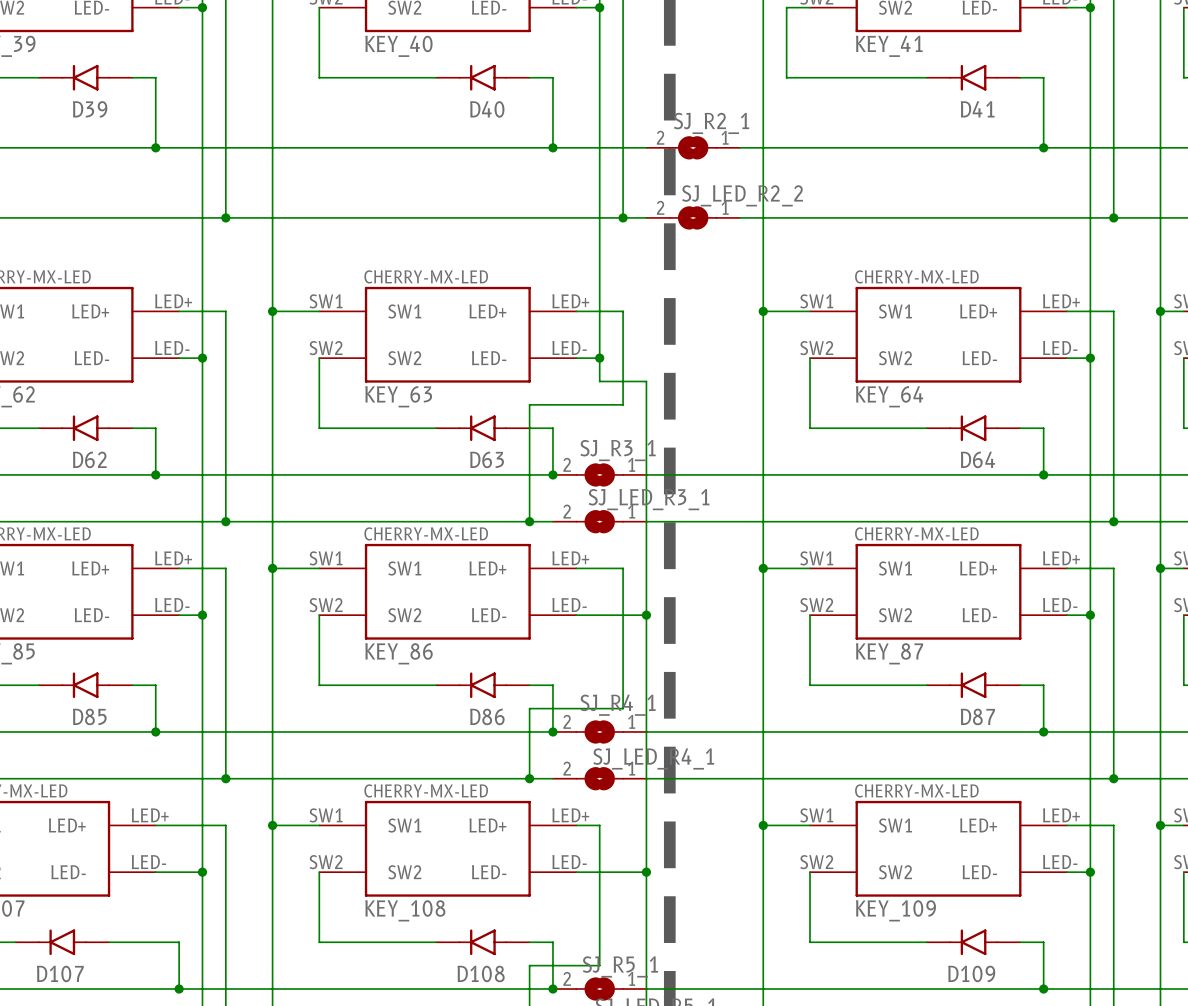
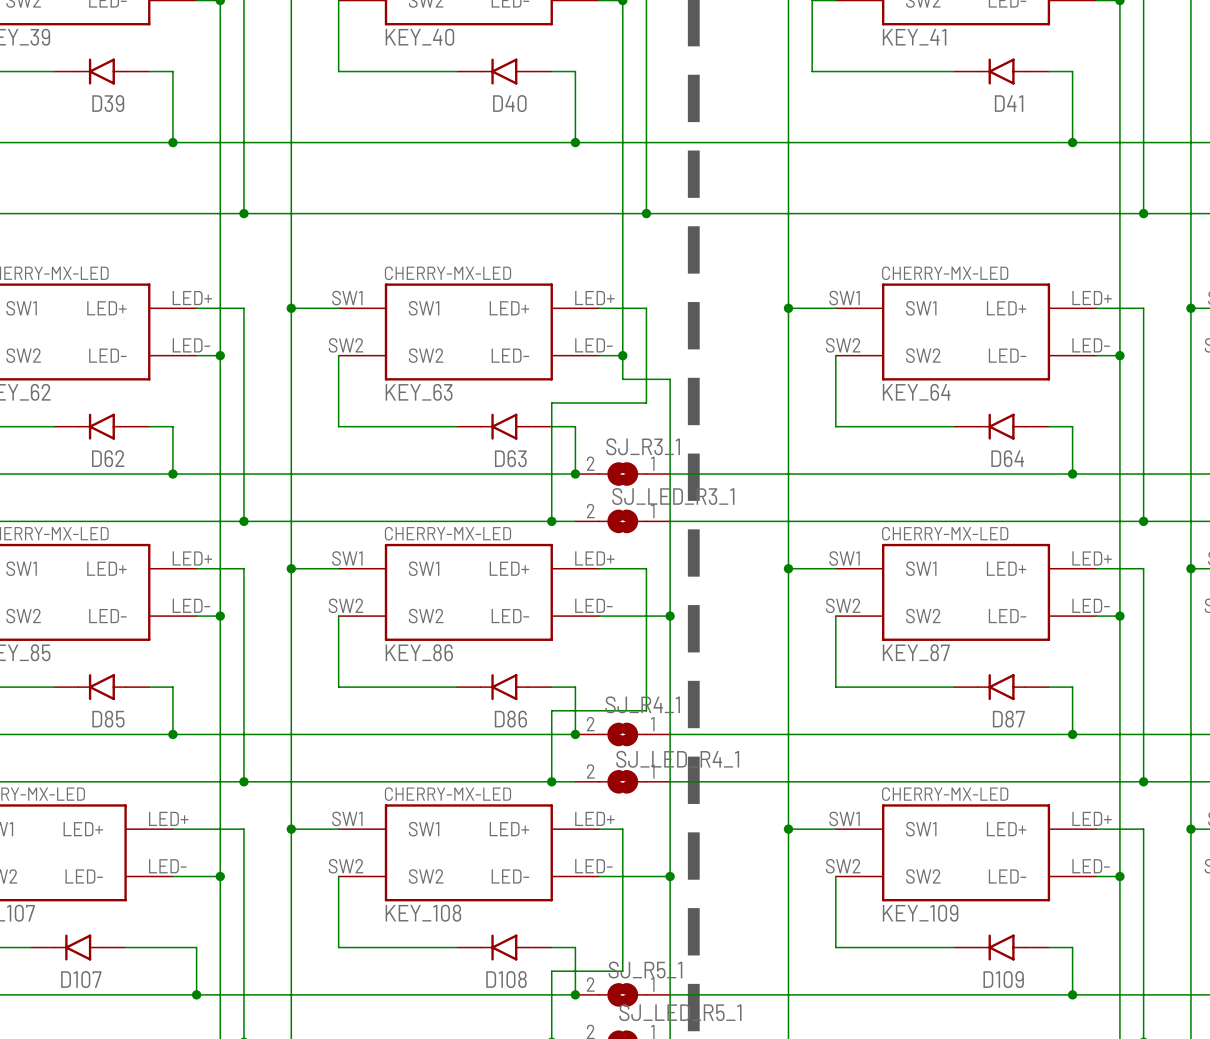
SJ_R2_1: (693, 147) -> none
SJ_LED_R2_2: (693, 217) -> none

